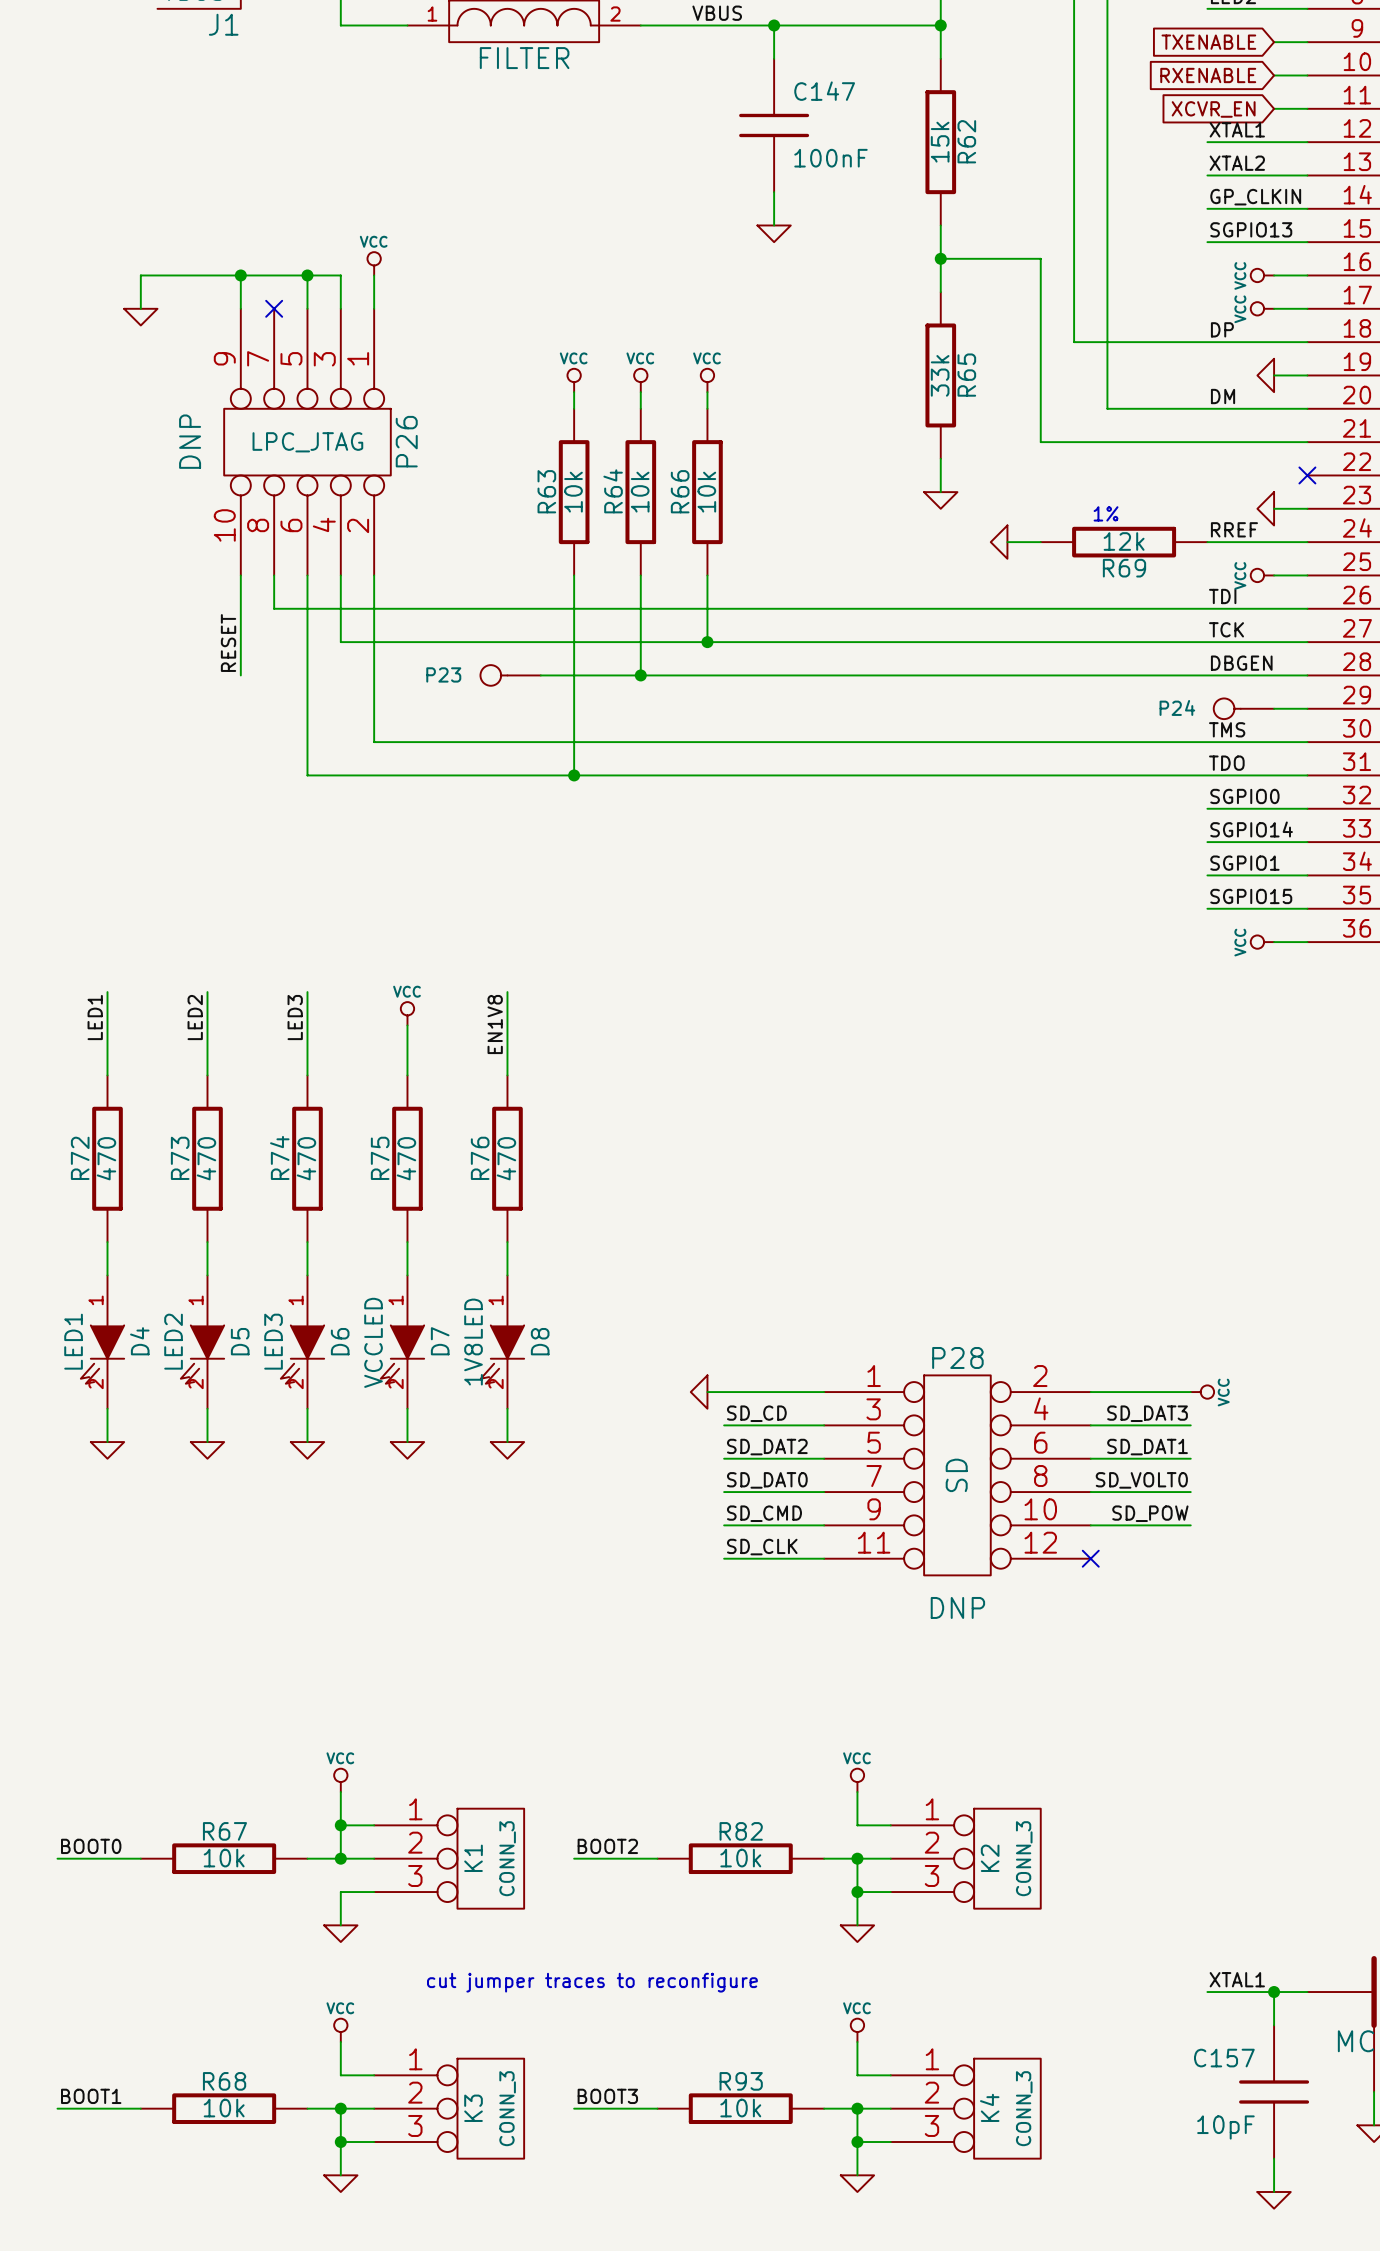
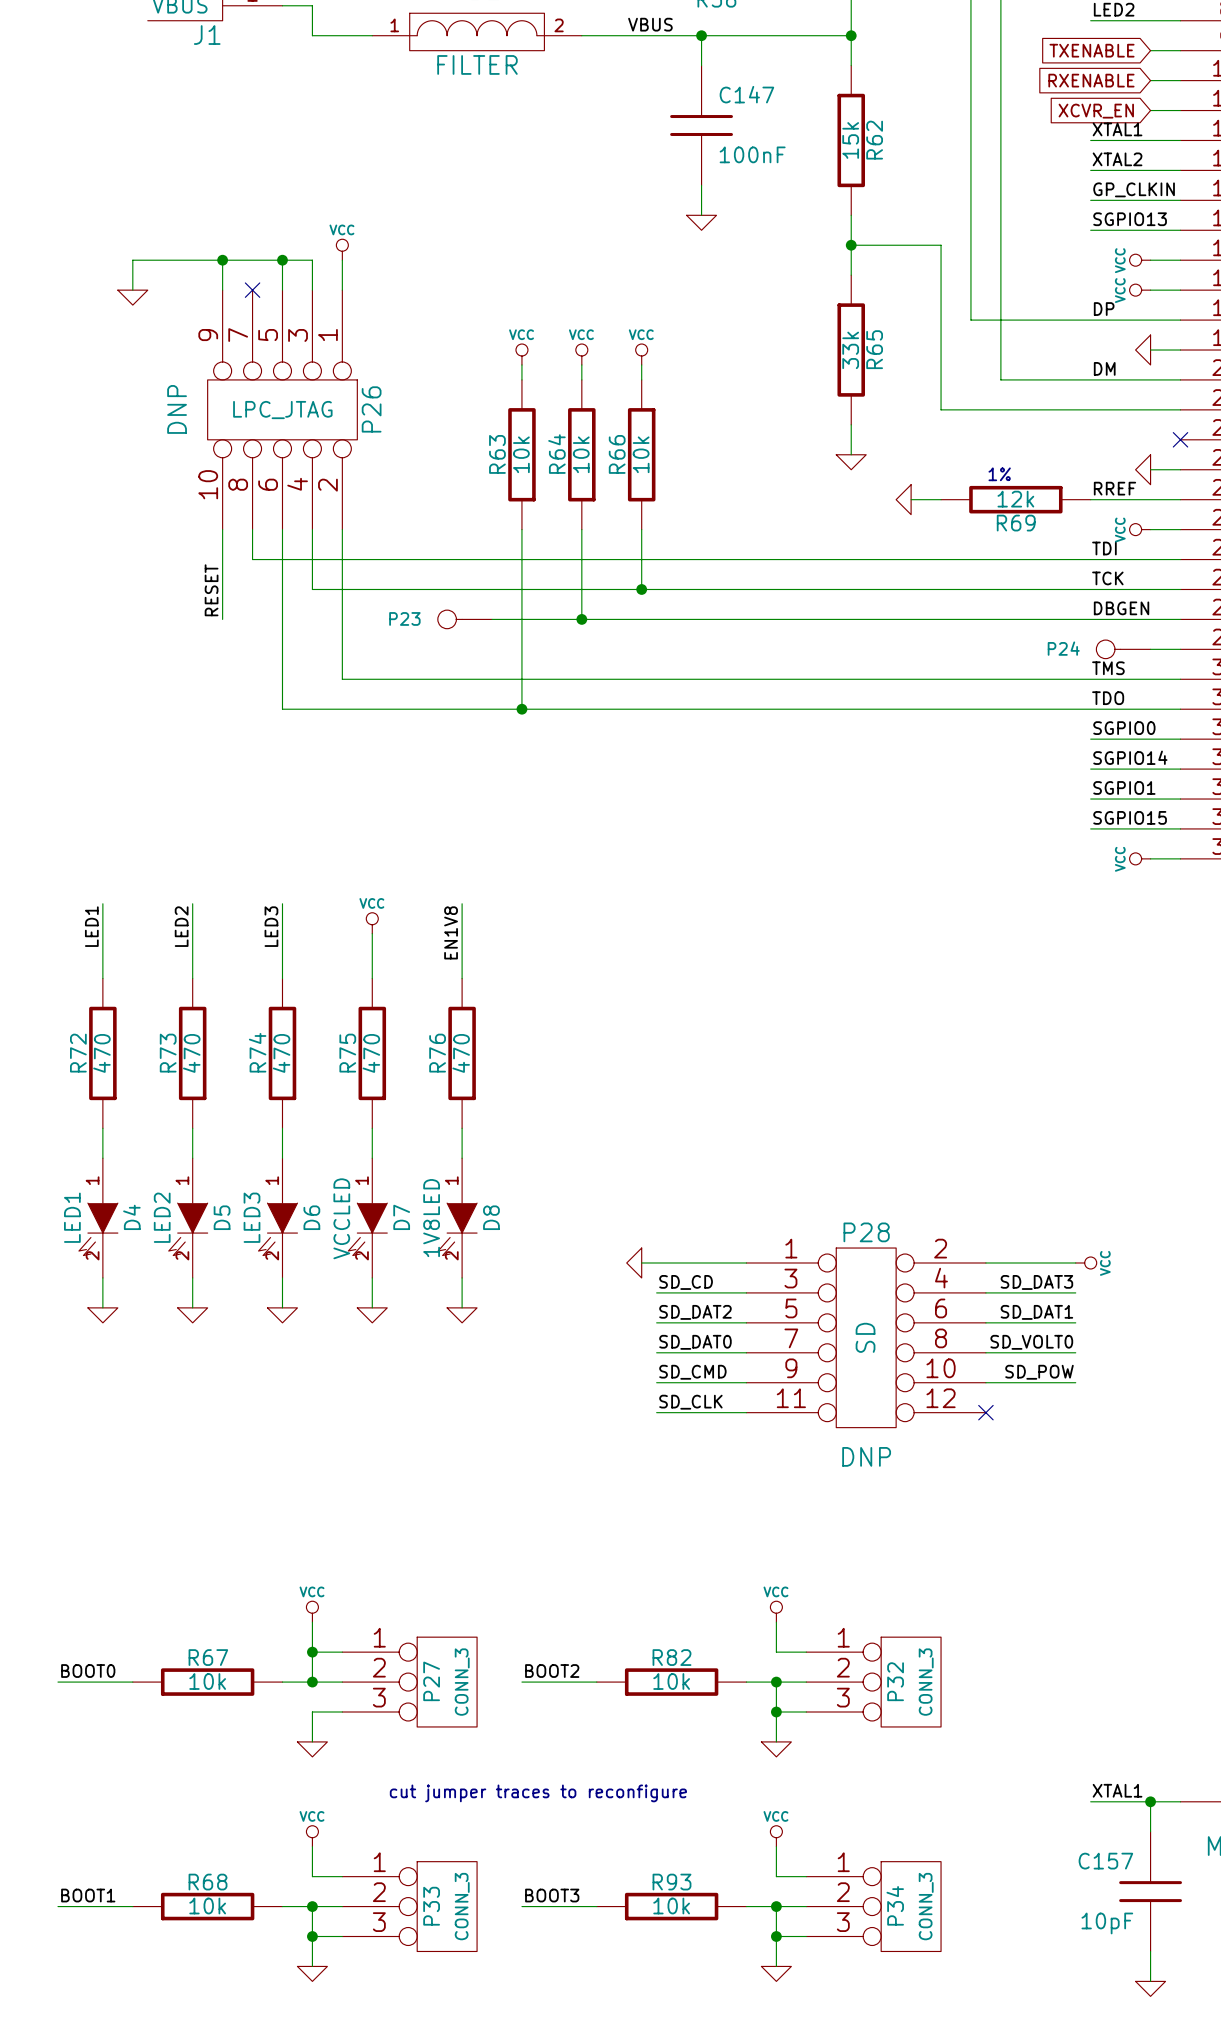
K1 name: K1 (473, 1858) -> P27 (431, 1681)
K2 name: K2 (990, 1858) -> P32 (895, 1681)
K4 name: K4 (989, 2107) -> P34 (895, 1905)
K3 name: K3 (473, 2108) -> P33 (431, 1906)

